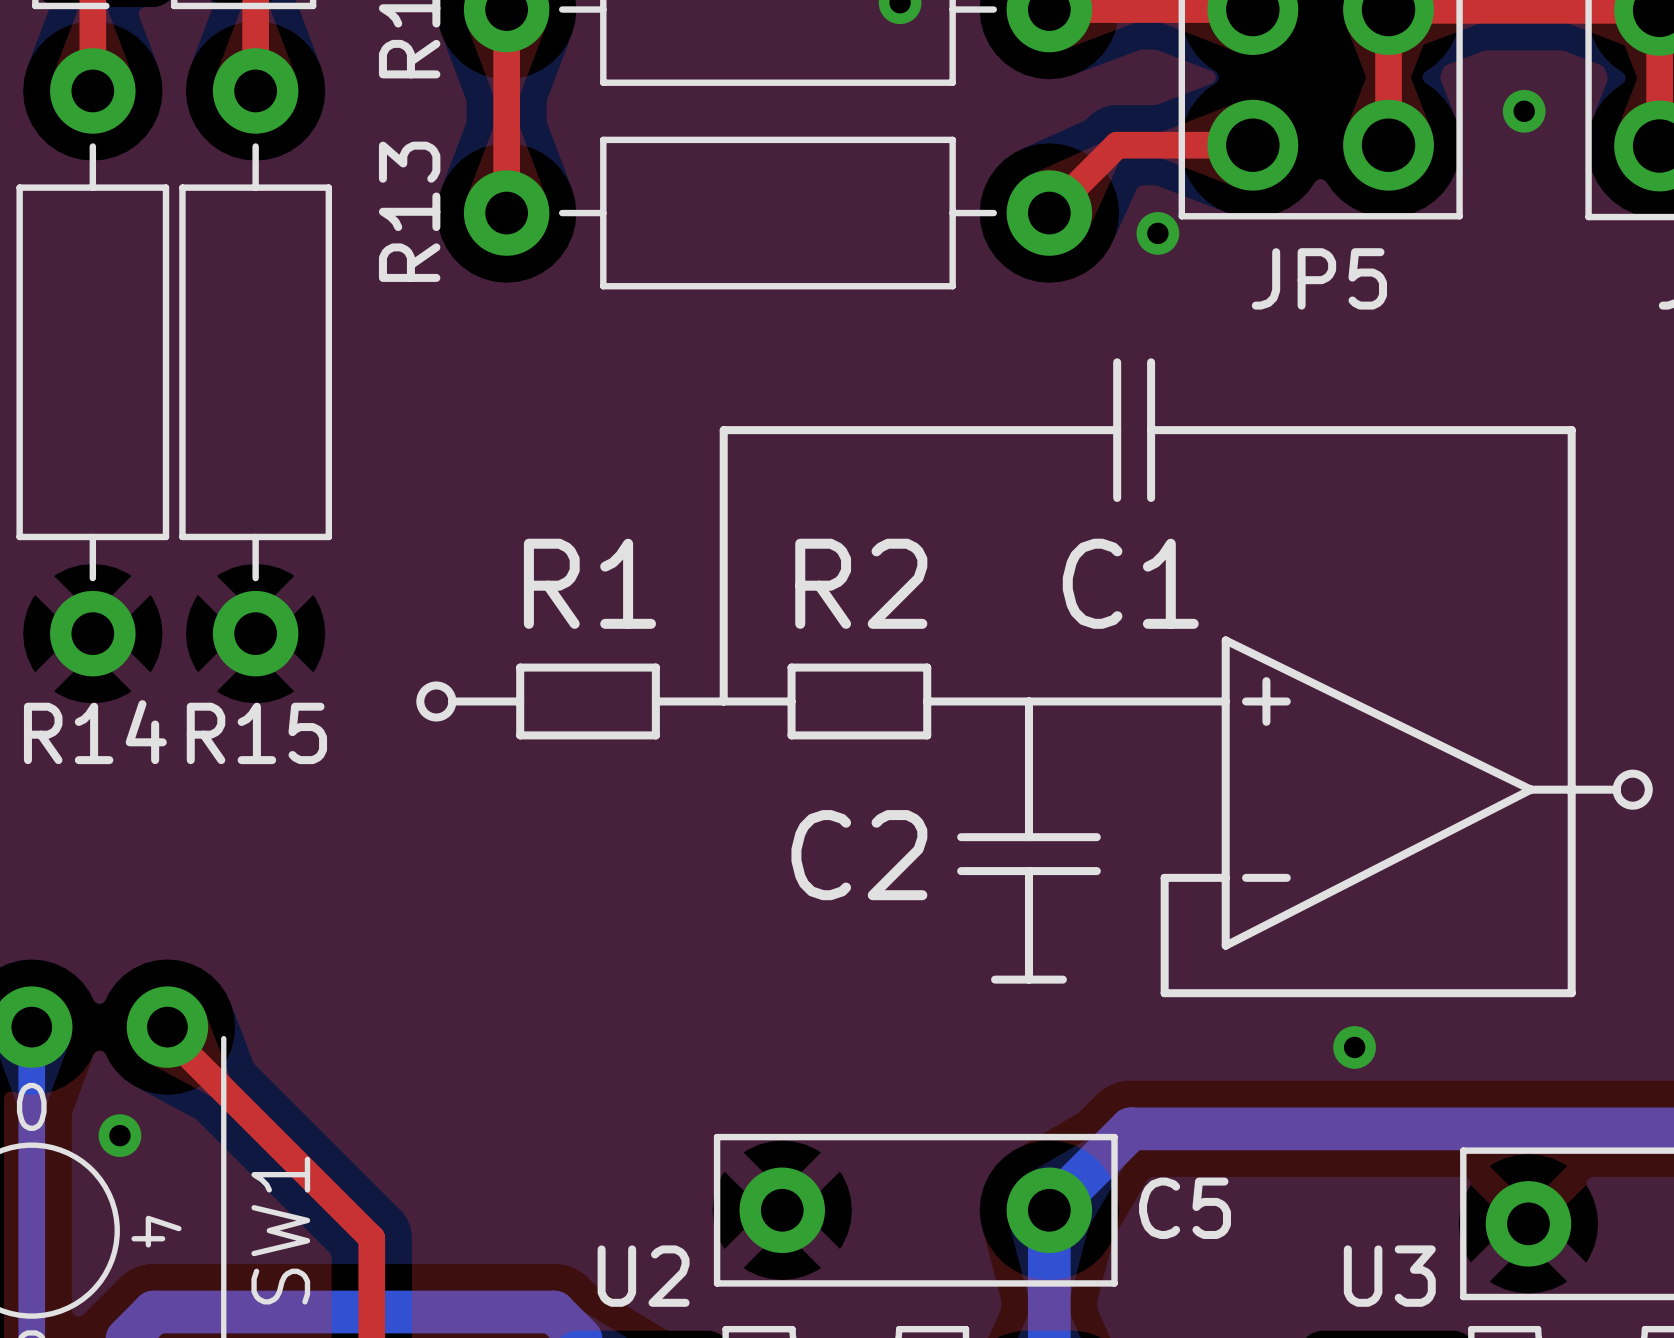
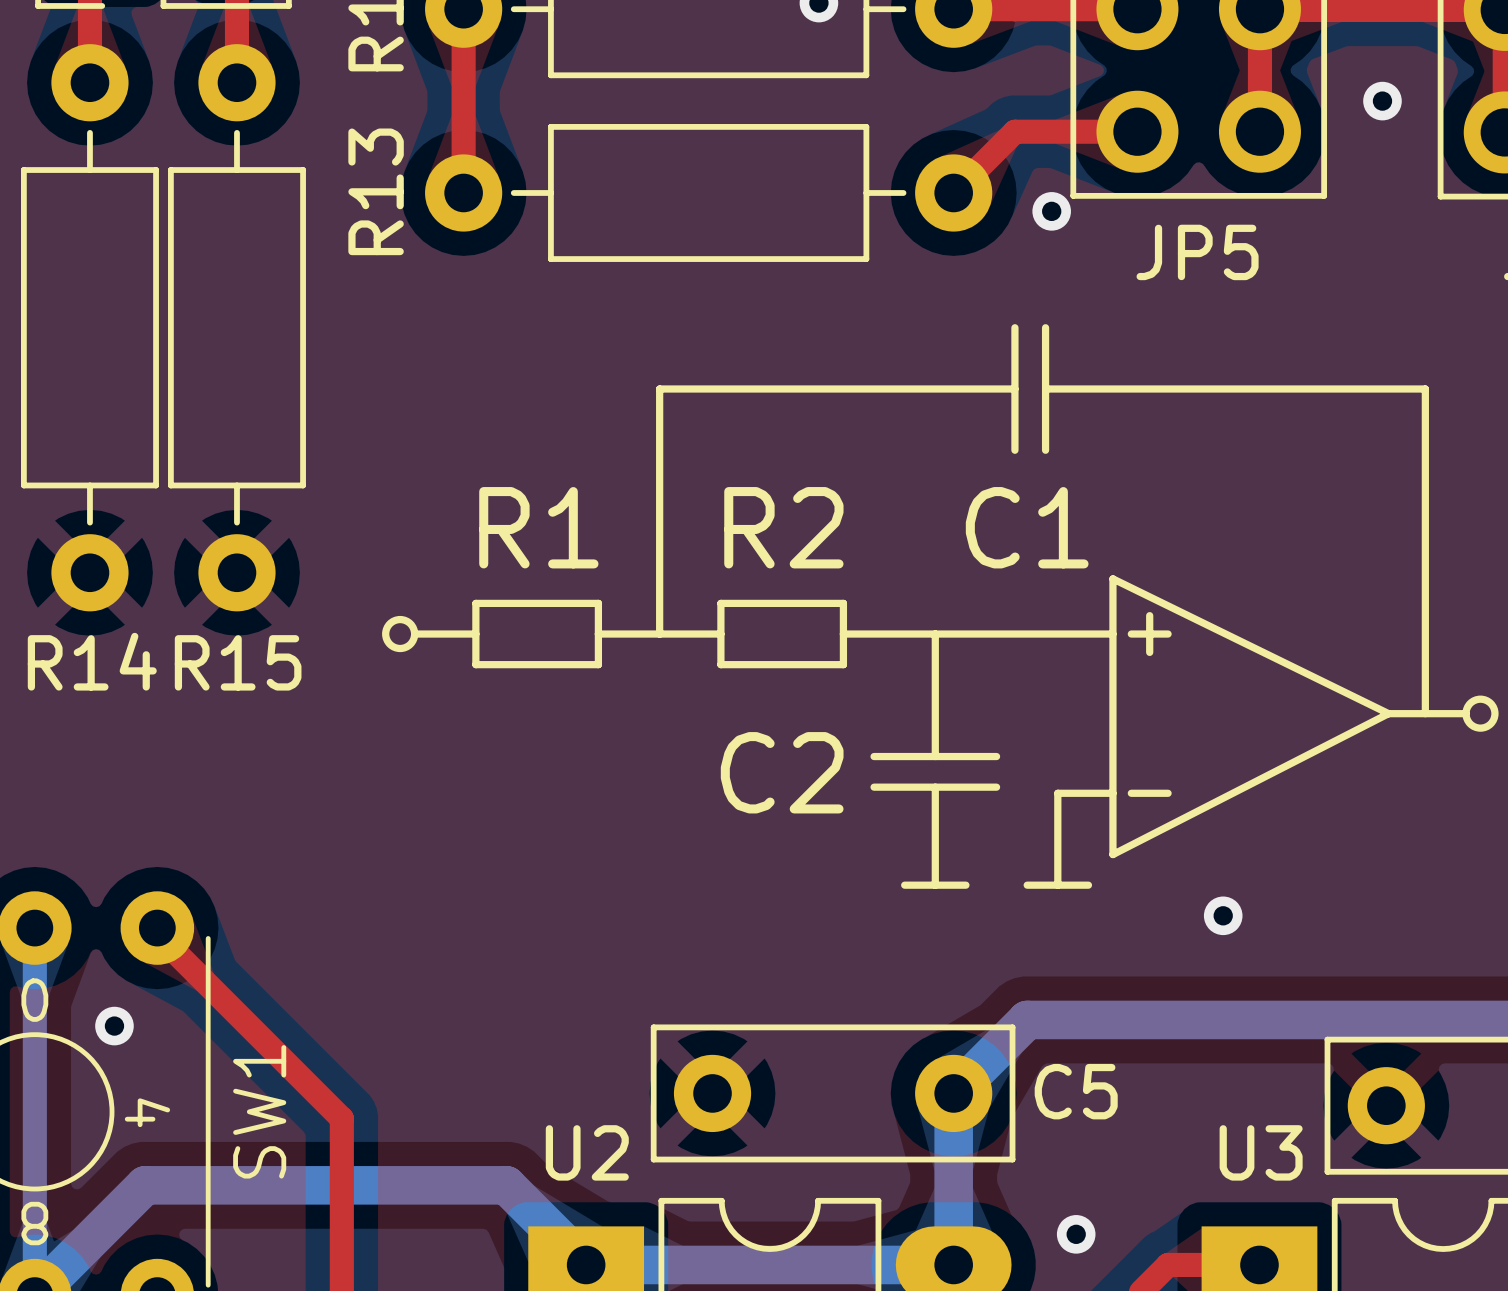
line: (1571, 791) (1571, 993) (1164, 993) (1164, 979) -> none
line: none -> (1027, 885) (1088, 885)
via position: (1354, 1047) -> (1223, 915)

